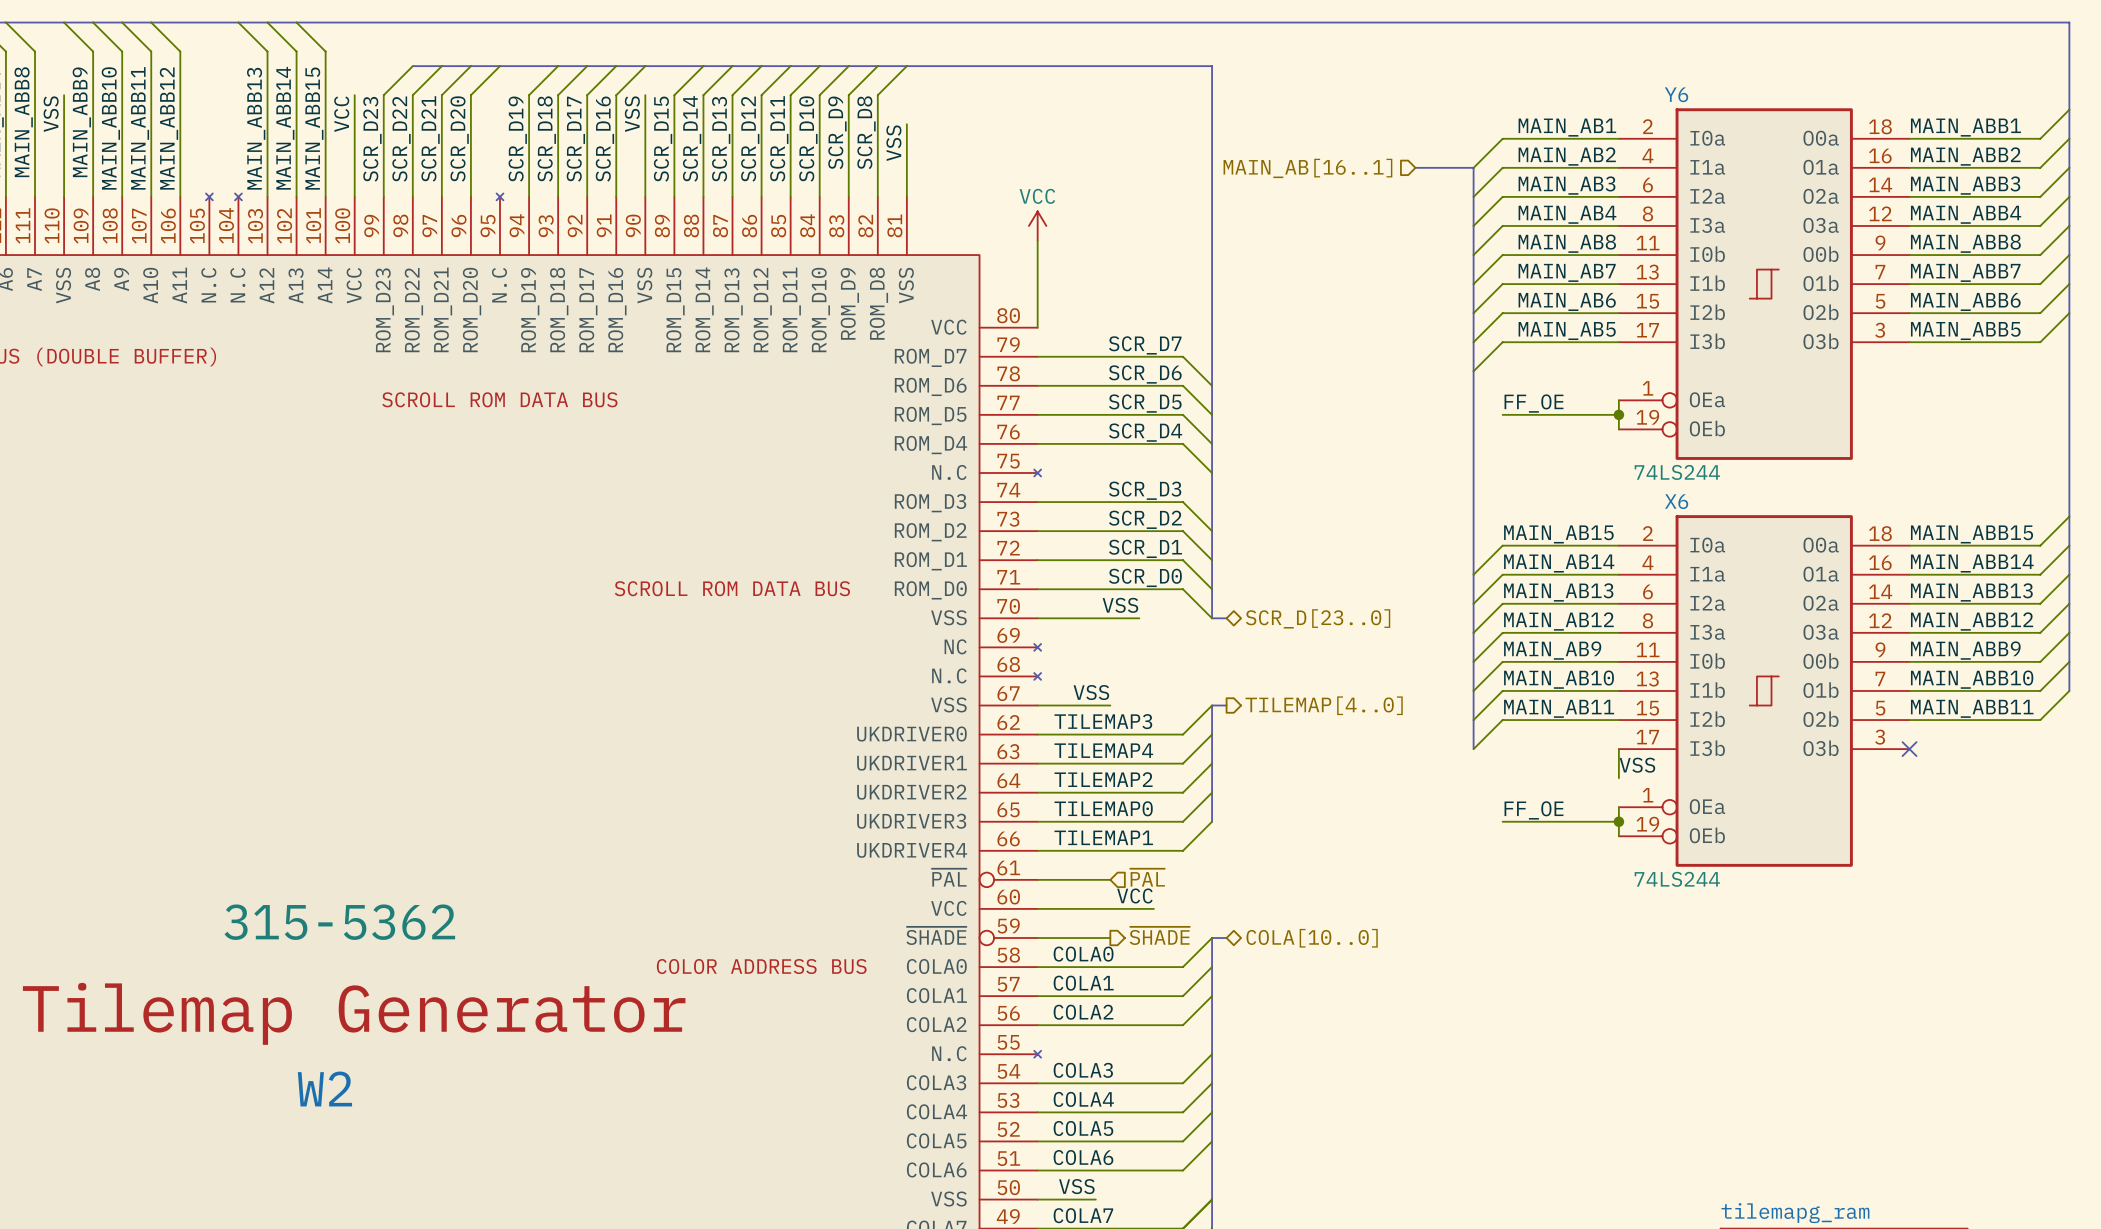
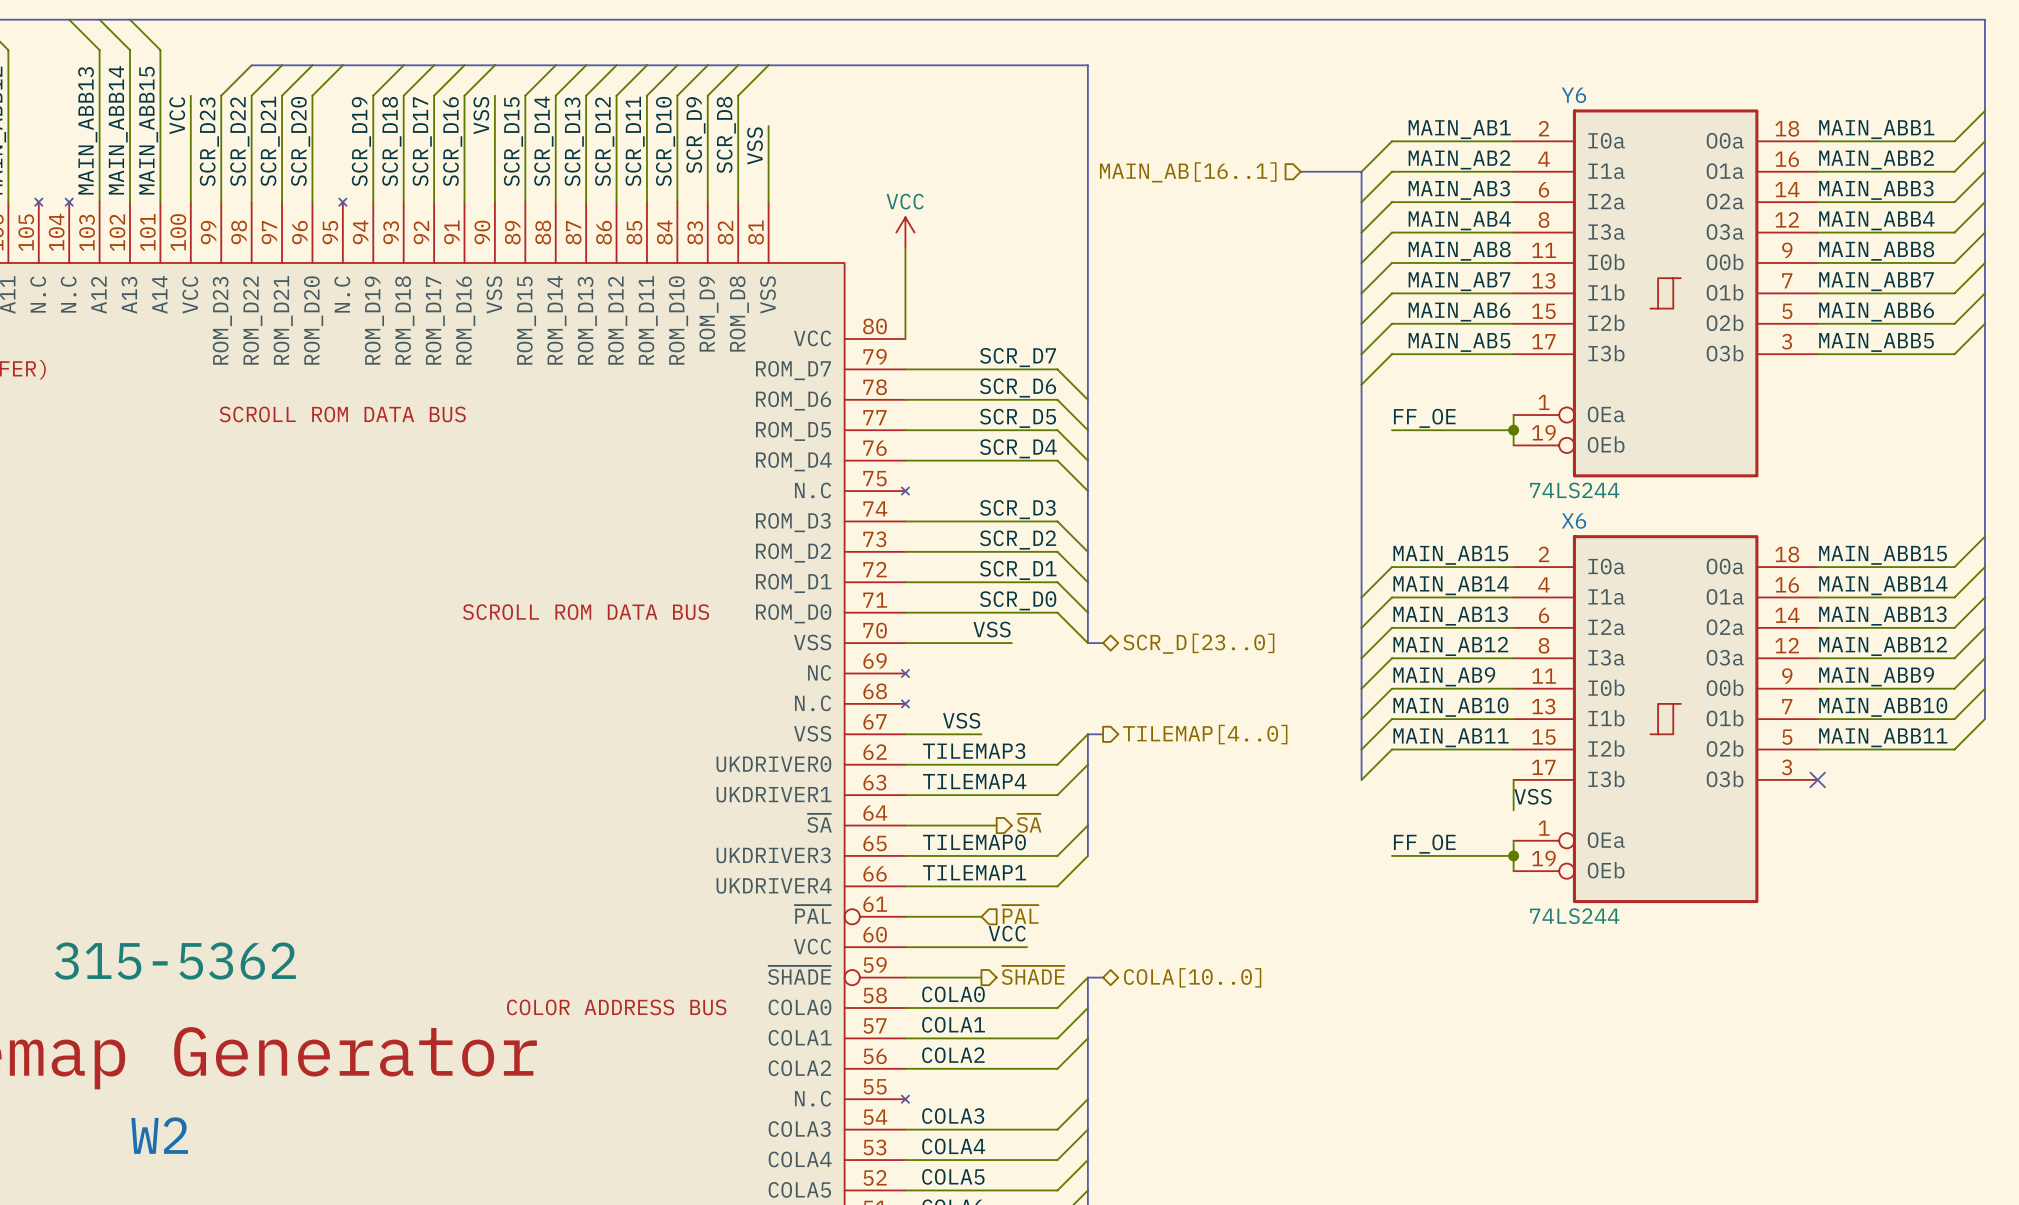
wire: (1212, 763) (1182, 792) (1124, 792) -> none
label: TILEMAP2 (1103, 779) -> none
hierarchical label: none -> ~{SA} (1029, 823)
W2 pin name: UKDRIVER2 (911, 792) -> ~{SA} (819, 823)

